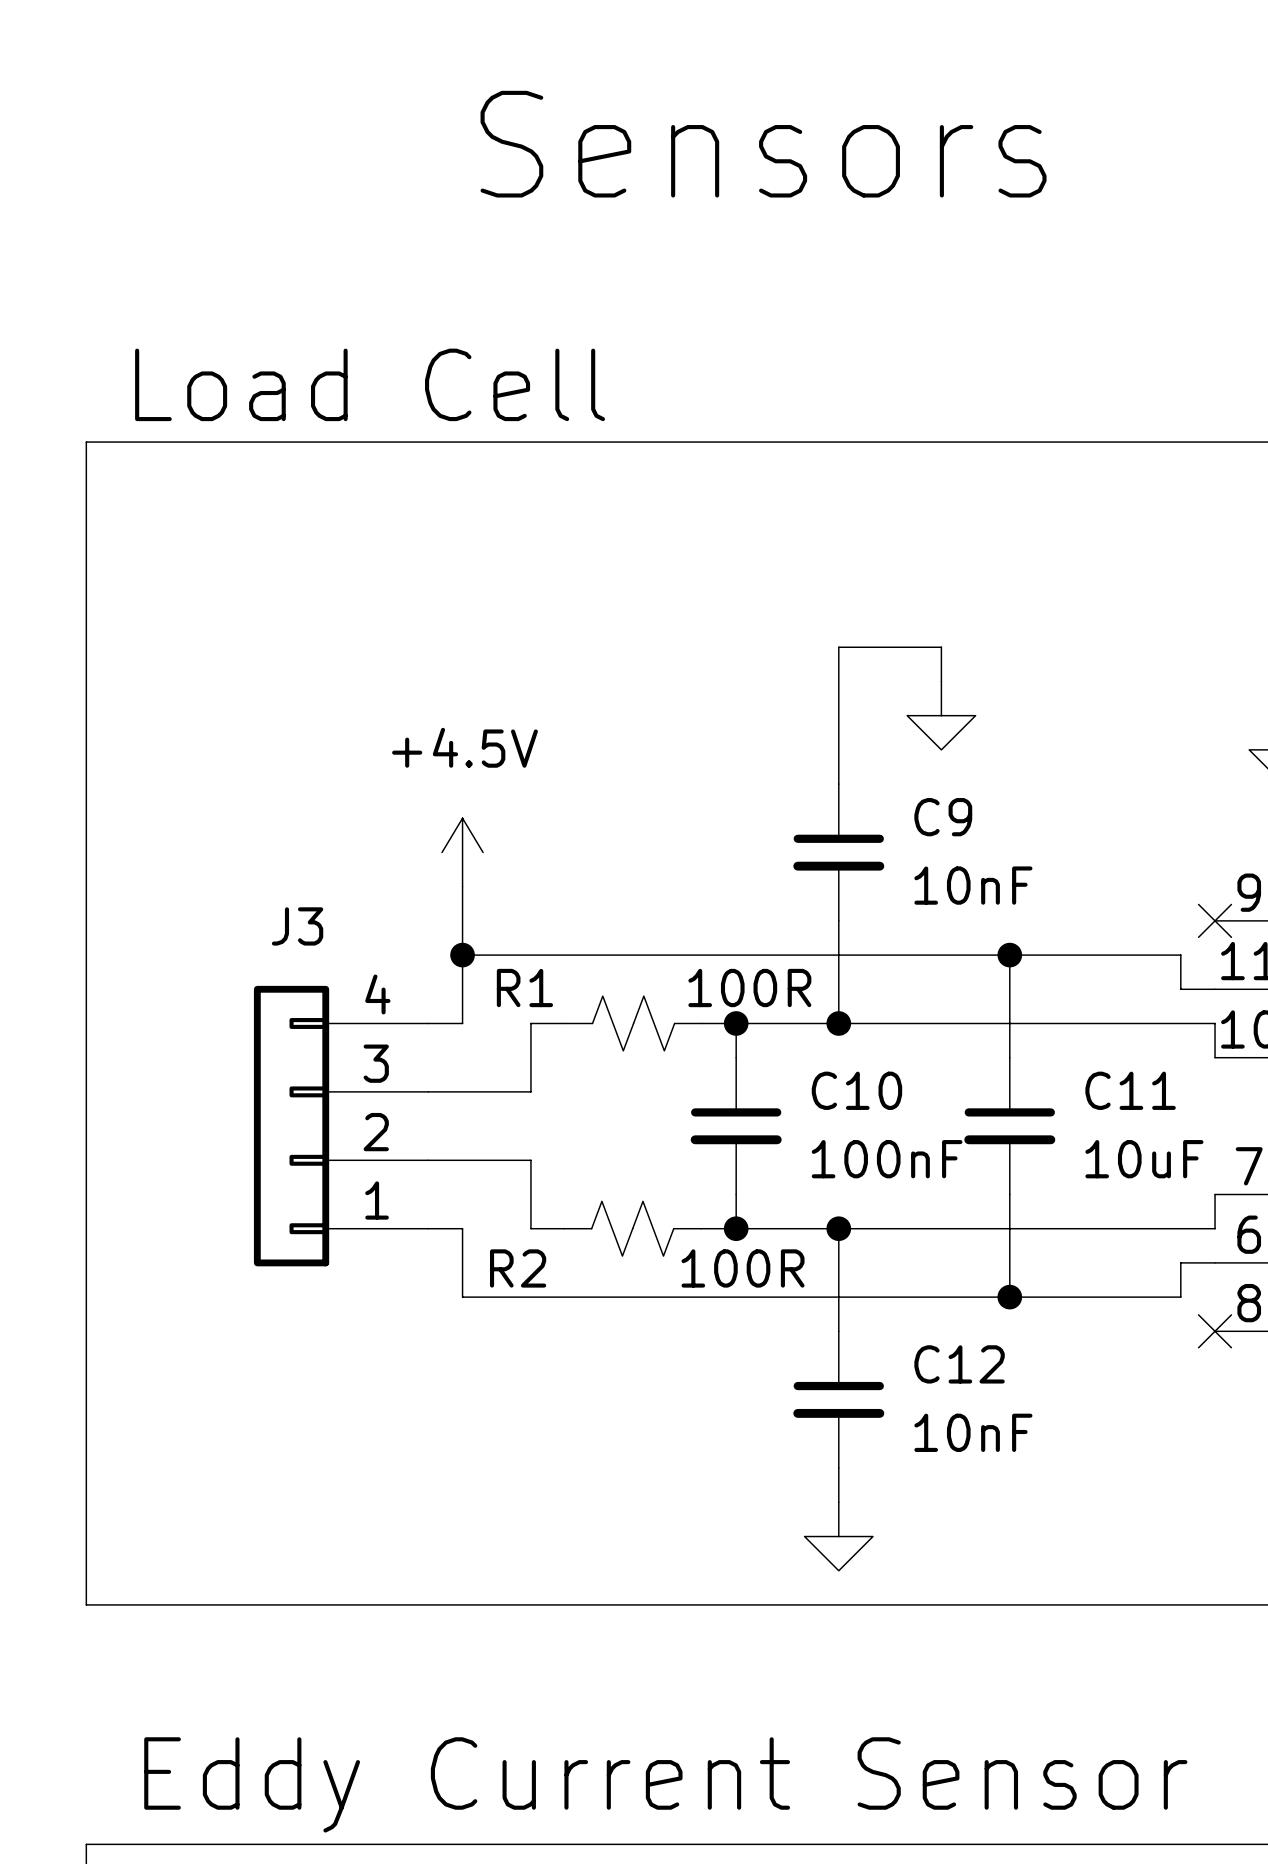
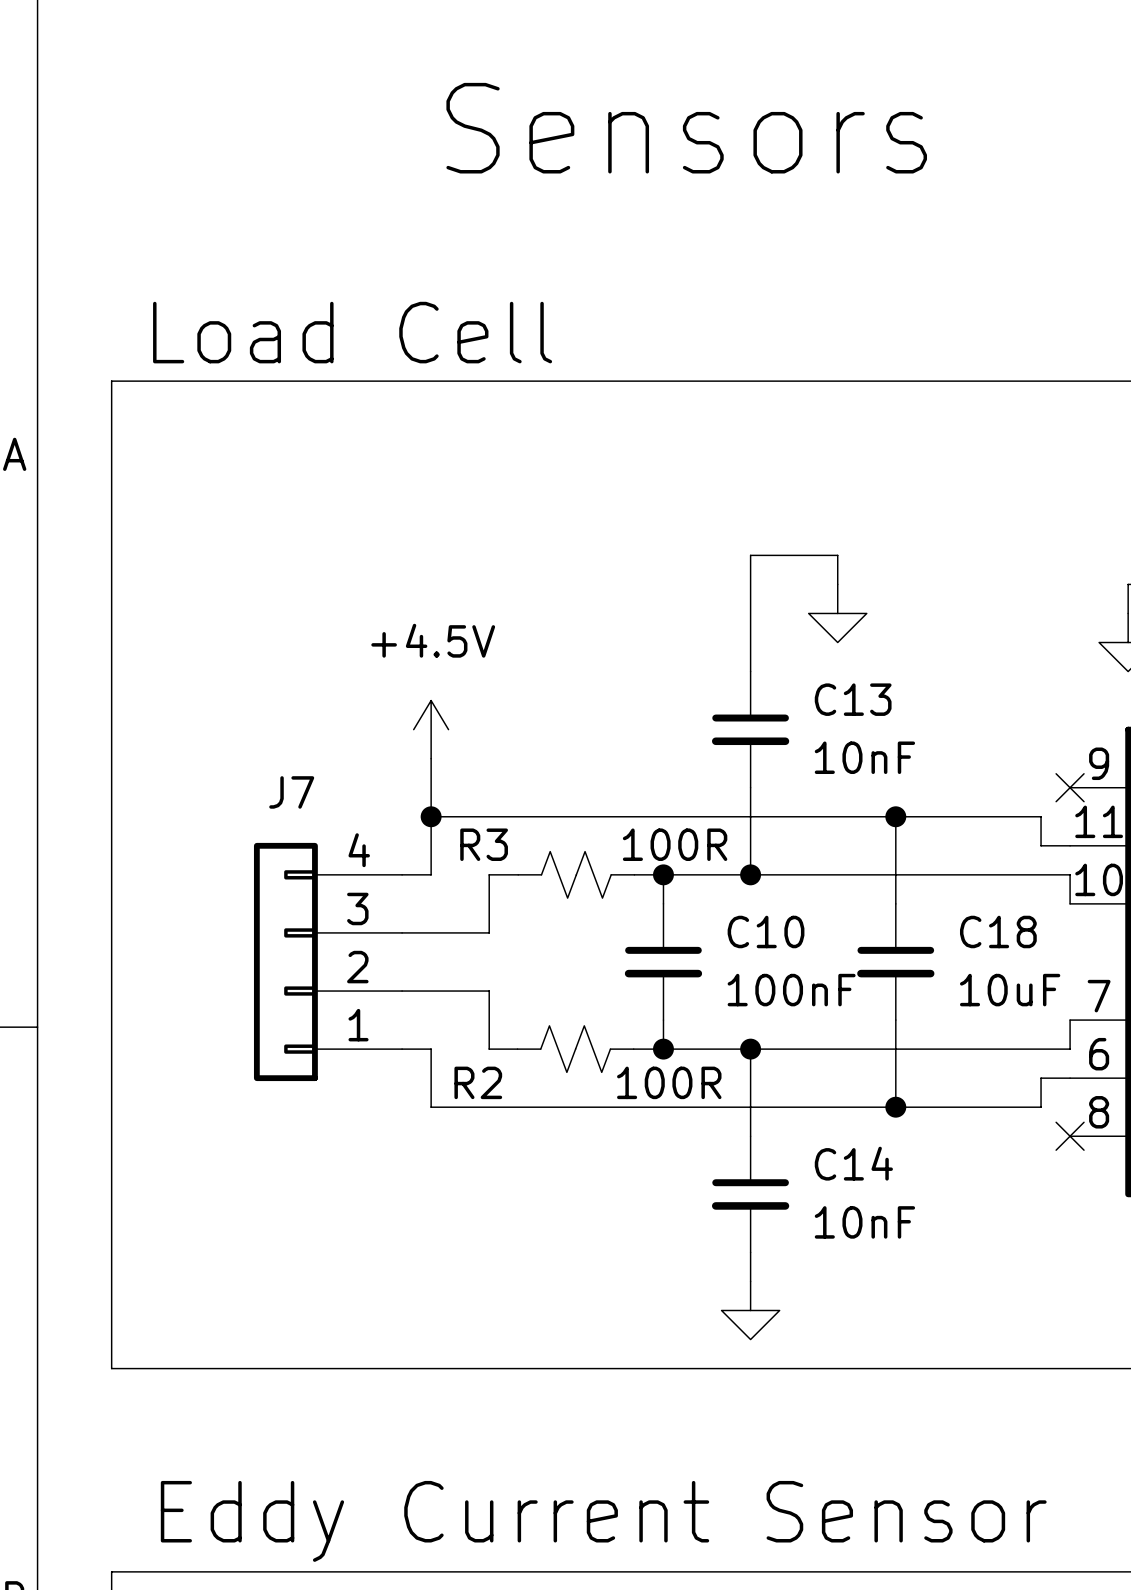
C9 name: C9 (943, 817) -> C13 (853, 699)
J3 name: J3 (297, 926) -> J7 (291, 792)
R1 name: R1 (524, 988) -> R3 (484, 844)
C11 name: C11 (1130, 1090) -> C18 (998, 931)
C12 name: C12 (959, 1364) -> C14 (853, 1163)

